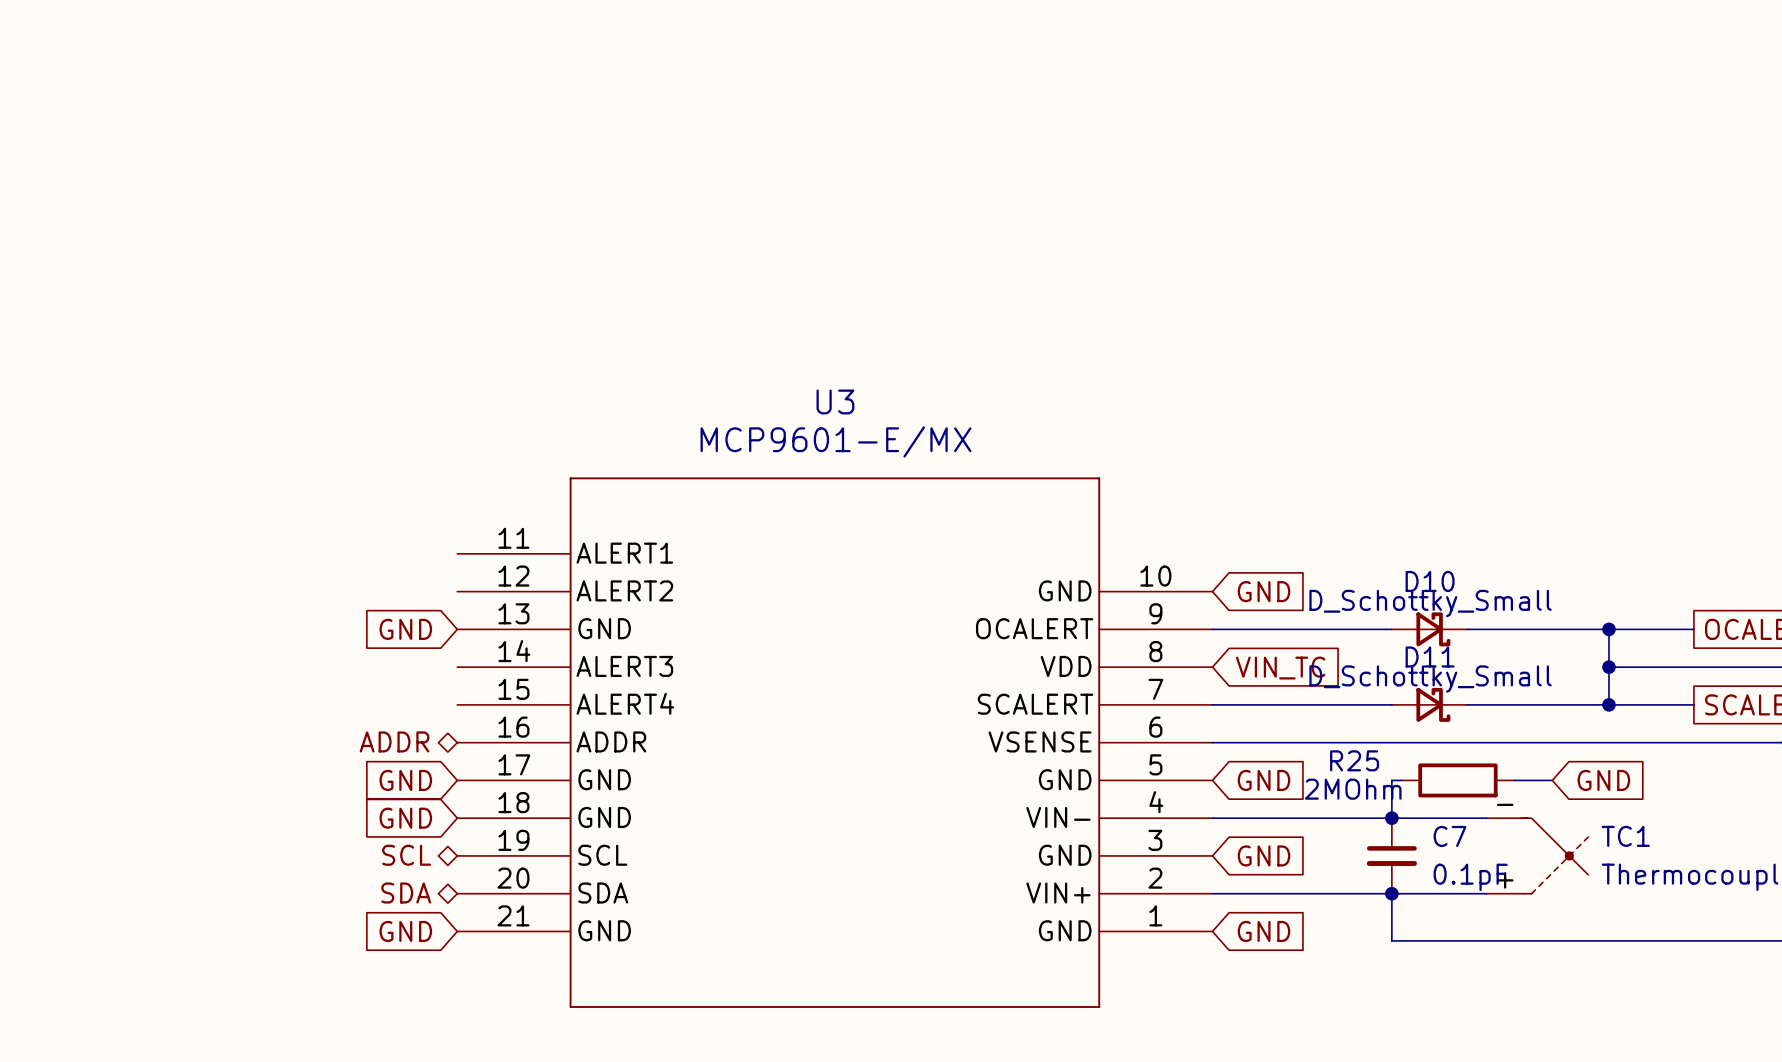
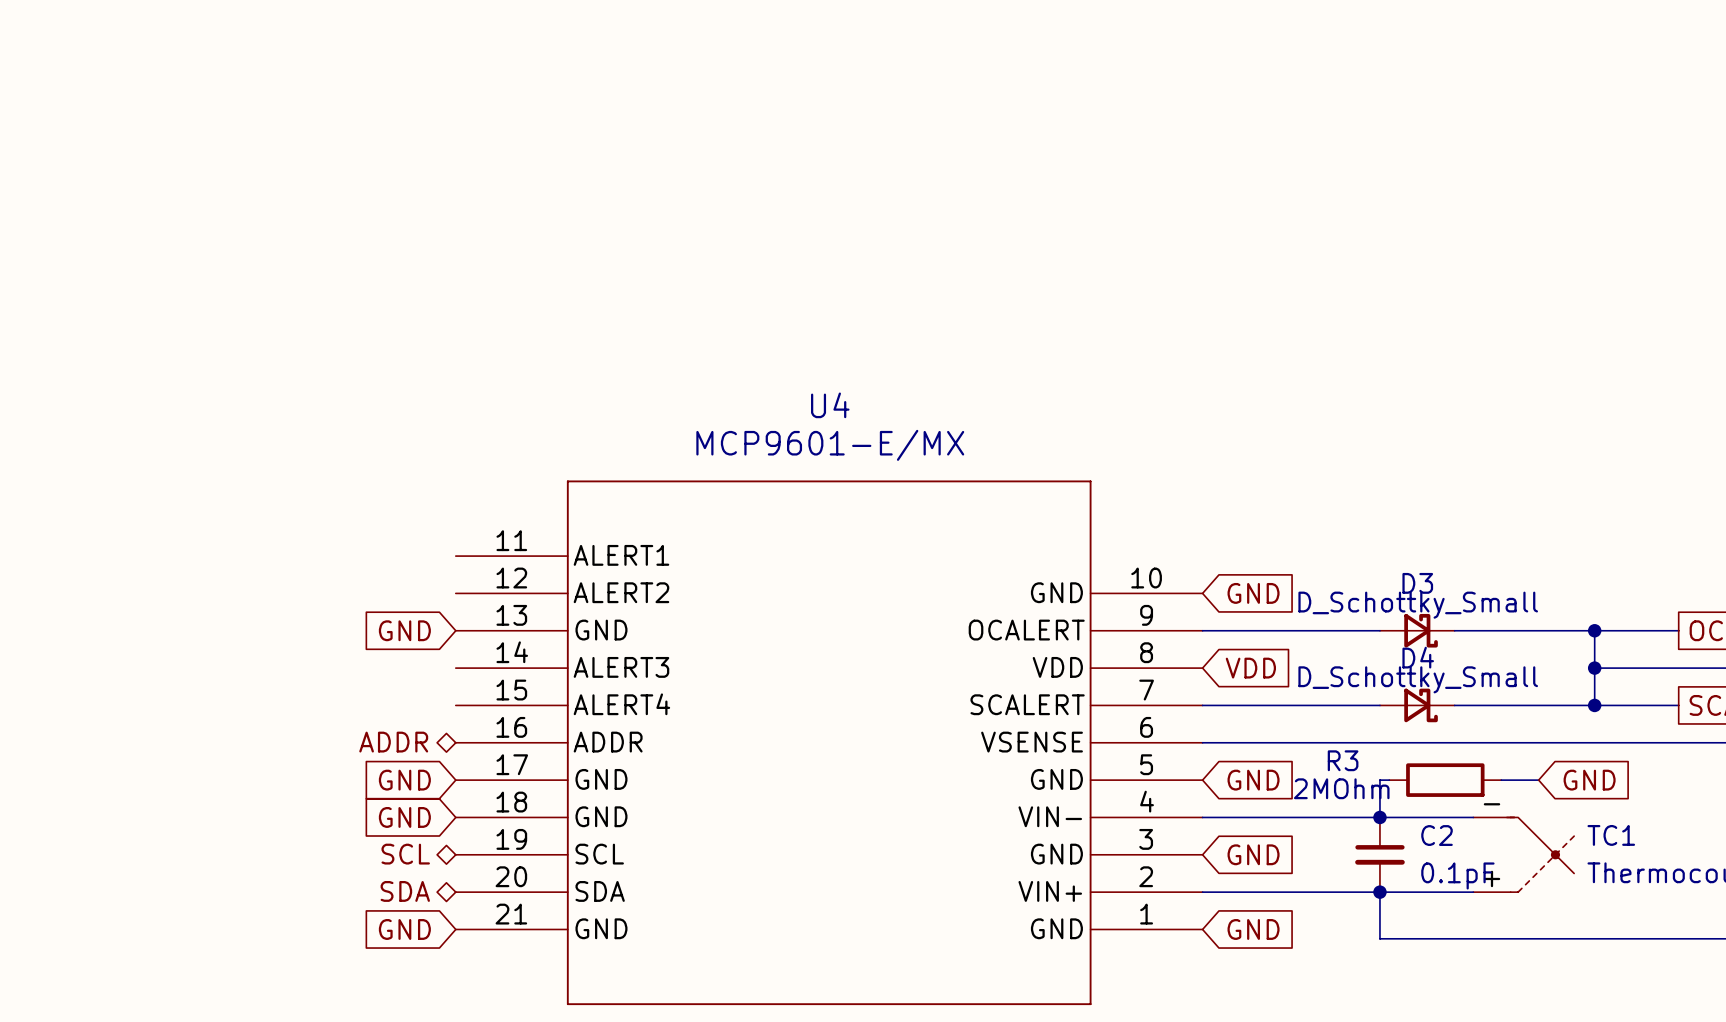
U3 name: U3 (835, 401) -> U4 (830, 405)
D10 name: D10 (1430, 581) -> D3 (1417, 583)
D11 name: D11 (1430, 657) -> D4 (1418, 657)
global label: VIN_TC (1280, 668) -> VDD (1250, 668)
R25 name: R25 (1354, 760) -> R3 (1343, 760)
C7 name: C7 (1450, 836) -> C2 (1437, 835)

